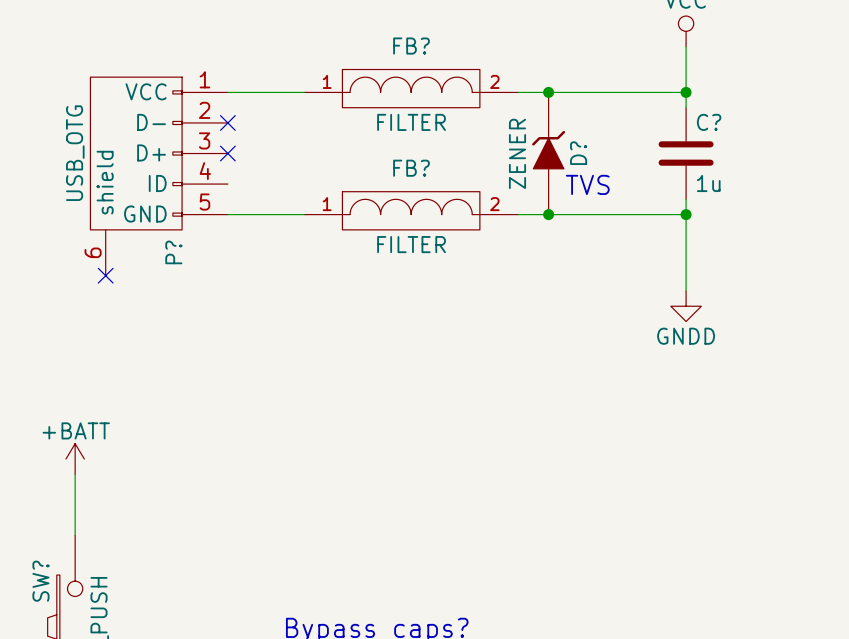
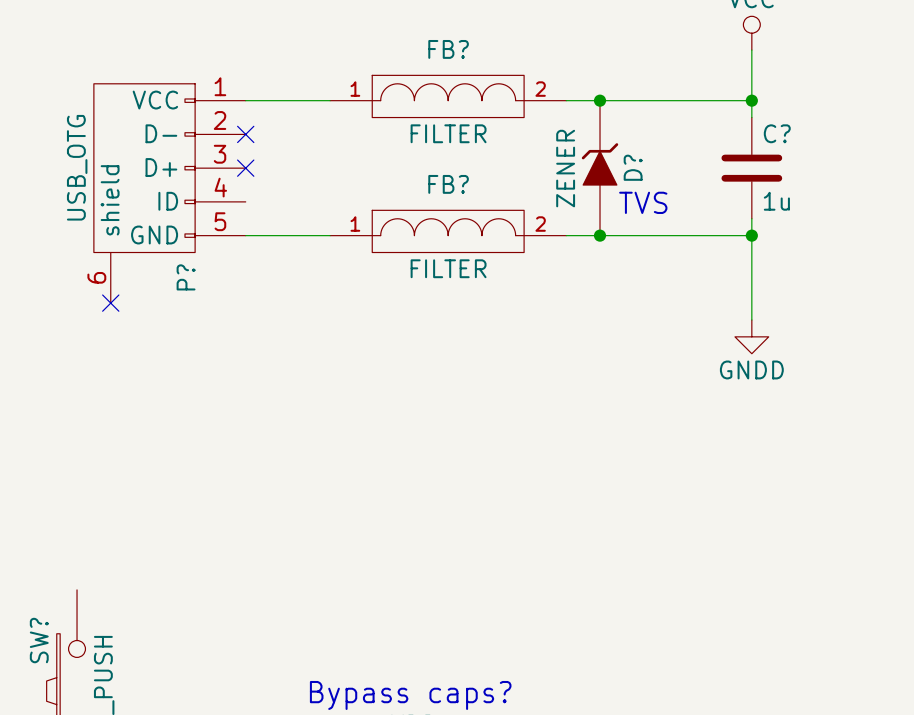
power symbol: +BATT (75, 458) -> none
wire: (75, 474) (75, 535) -> none

